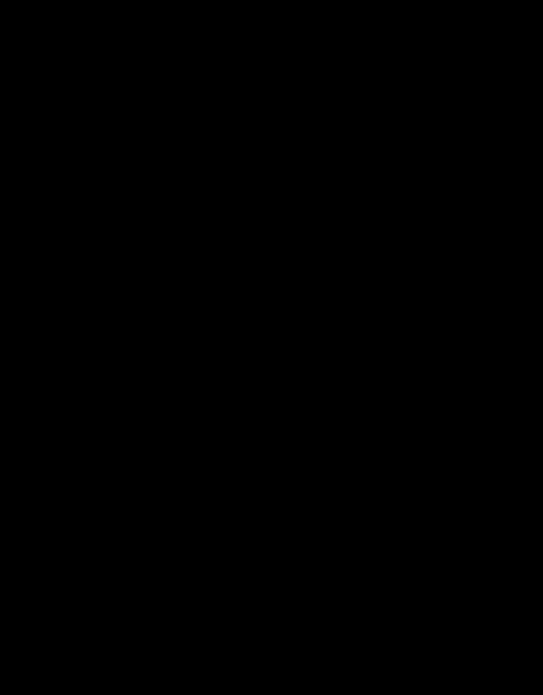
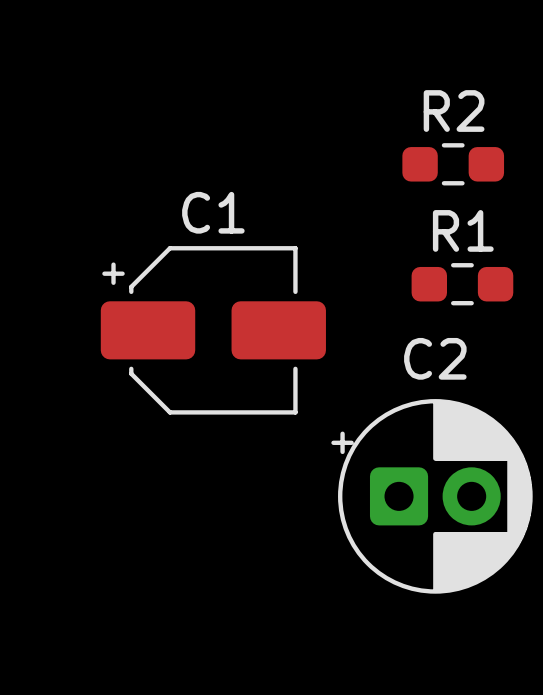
R2: none -> (453, 164)
R1: none -> (462, 284)
C1: none -> (213, 330)
C2: none -> (431, 496)

